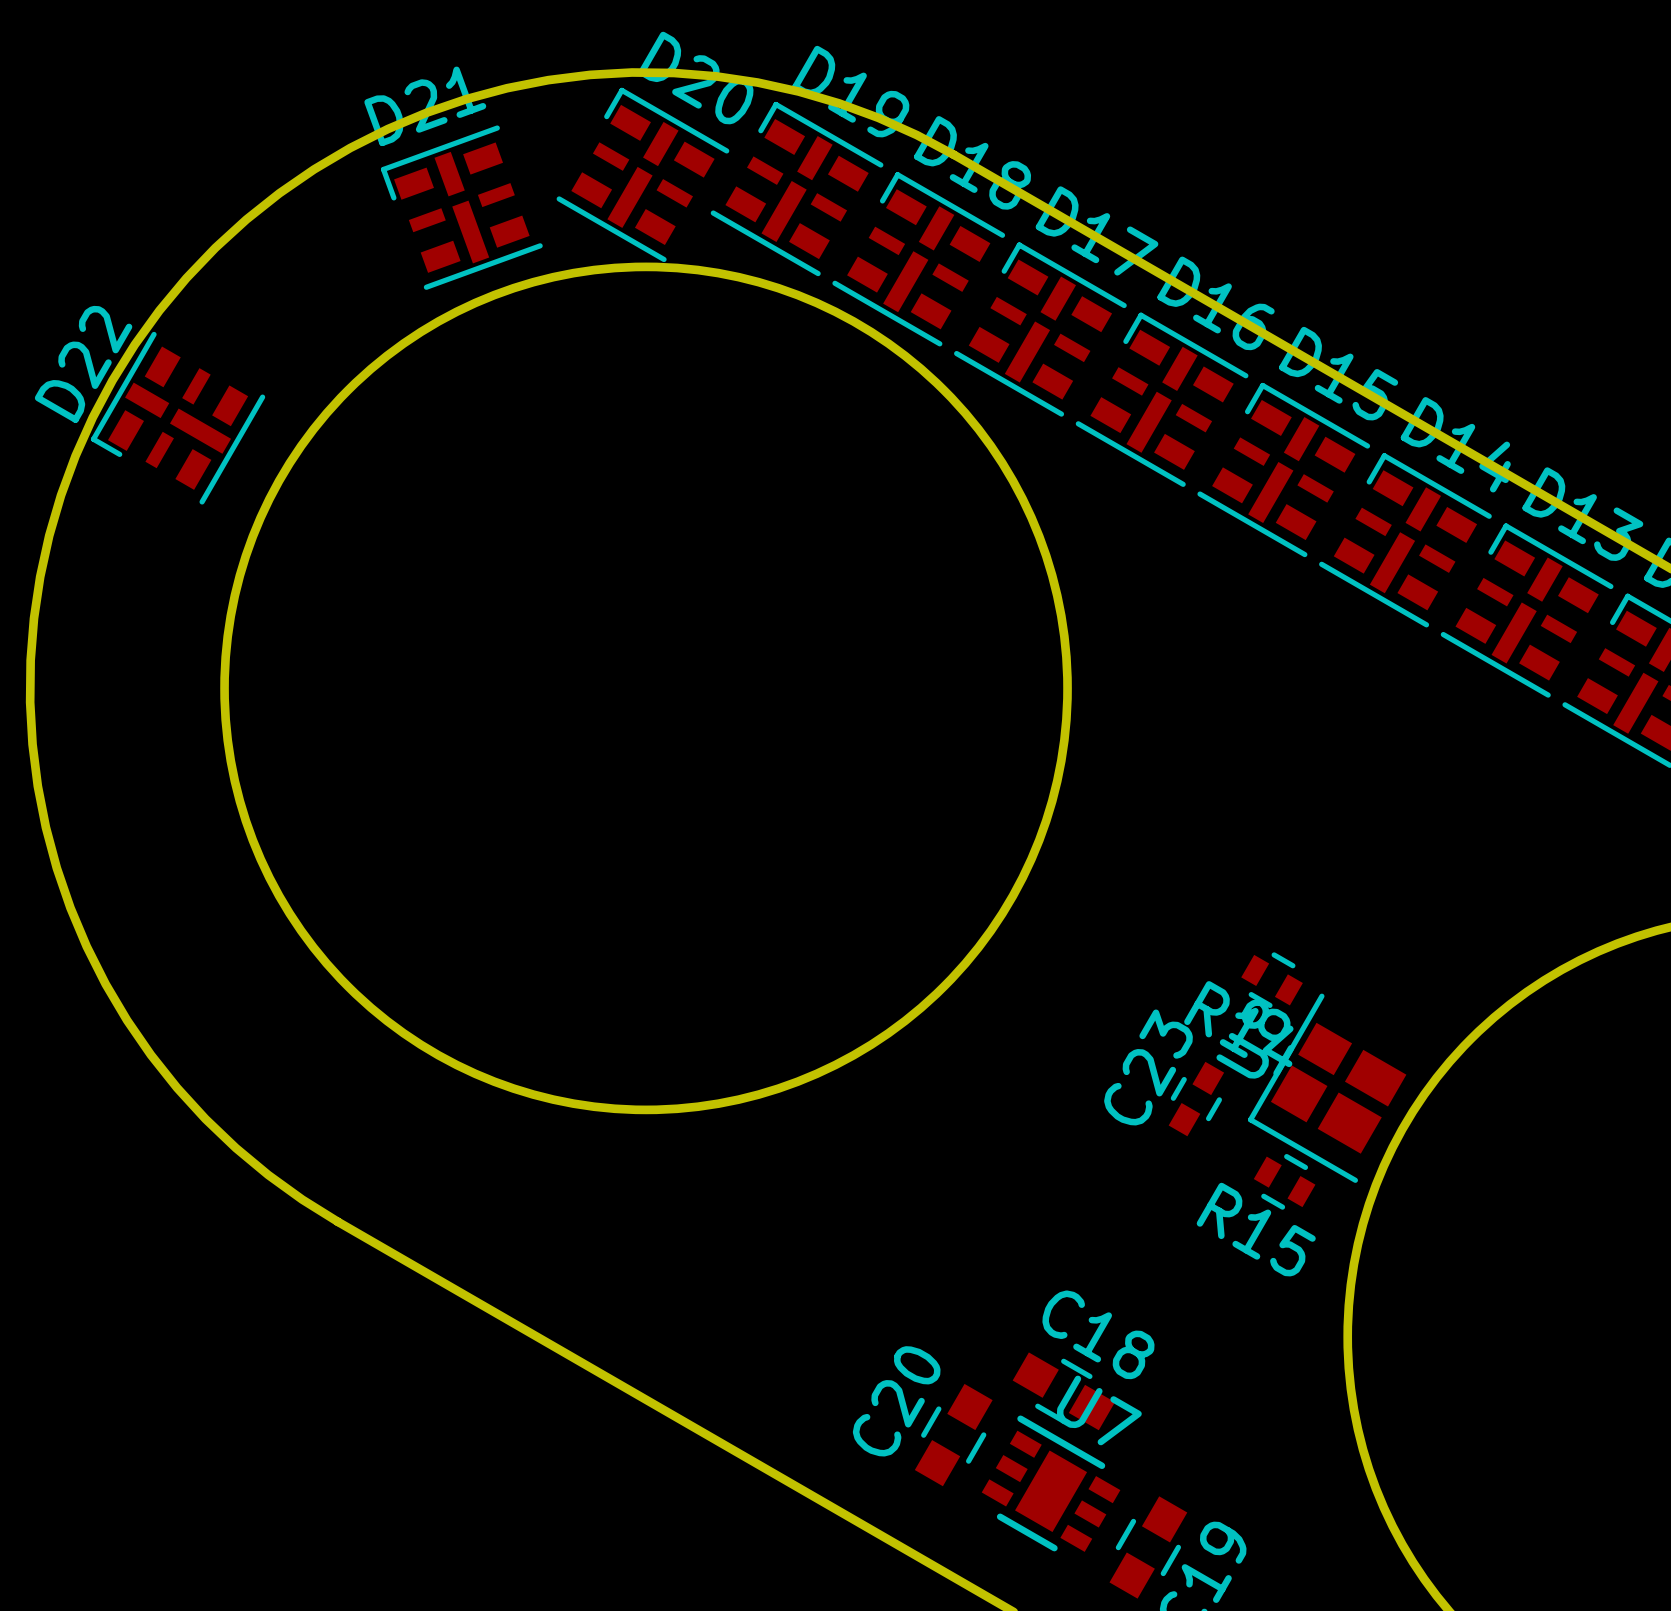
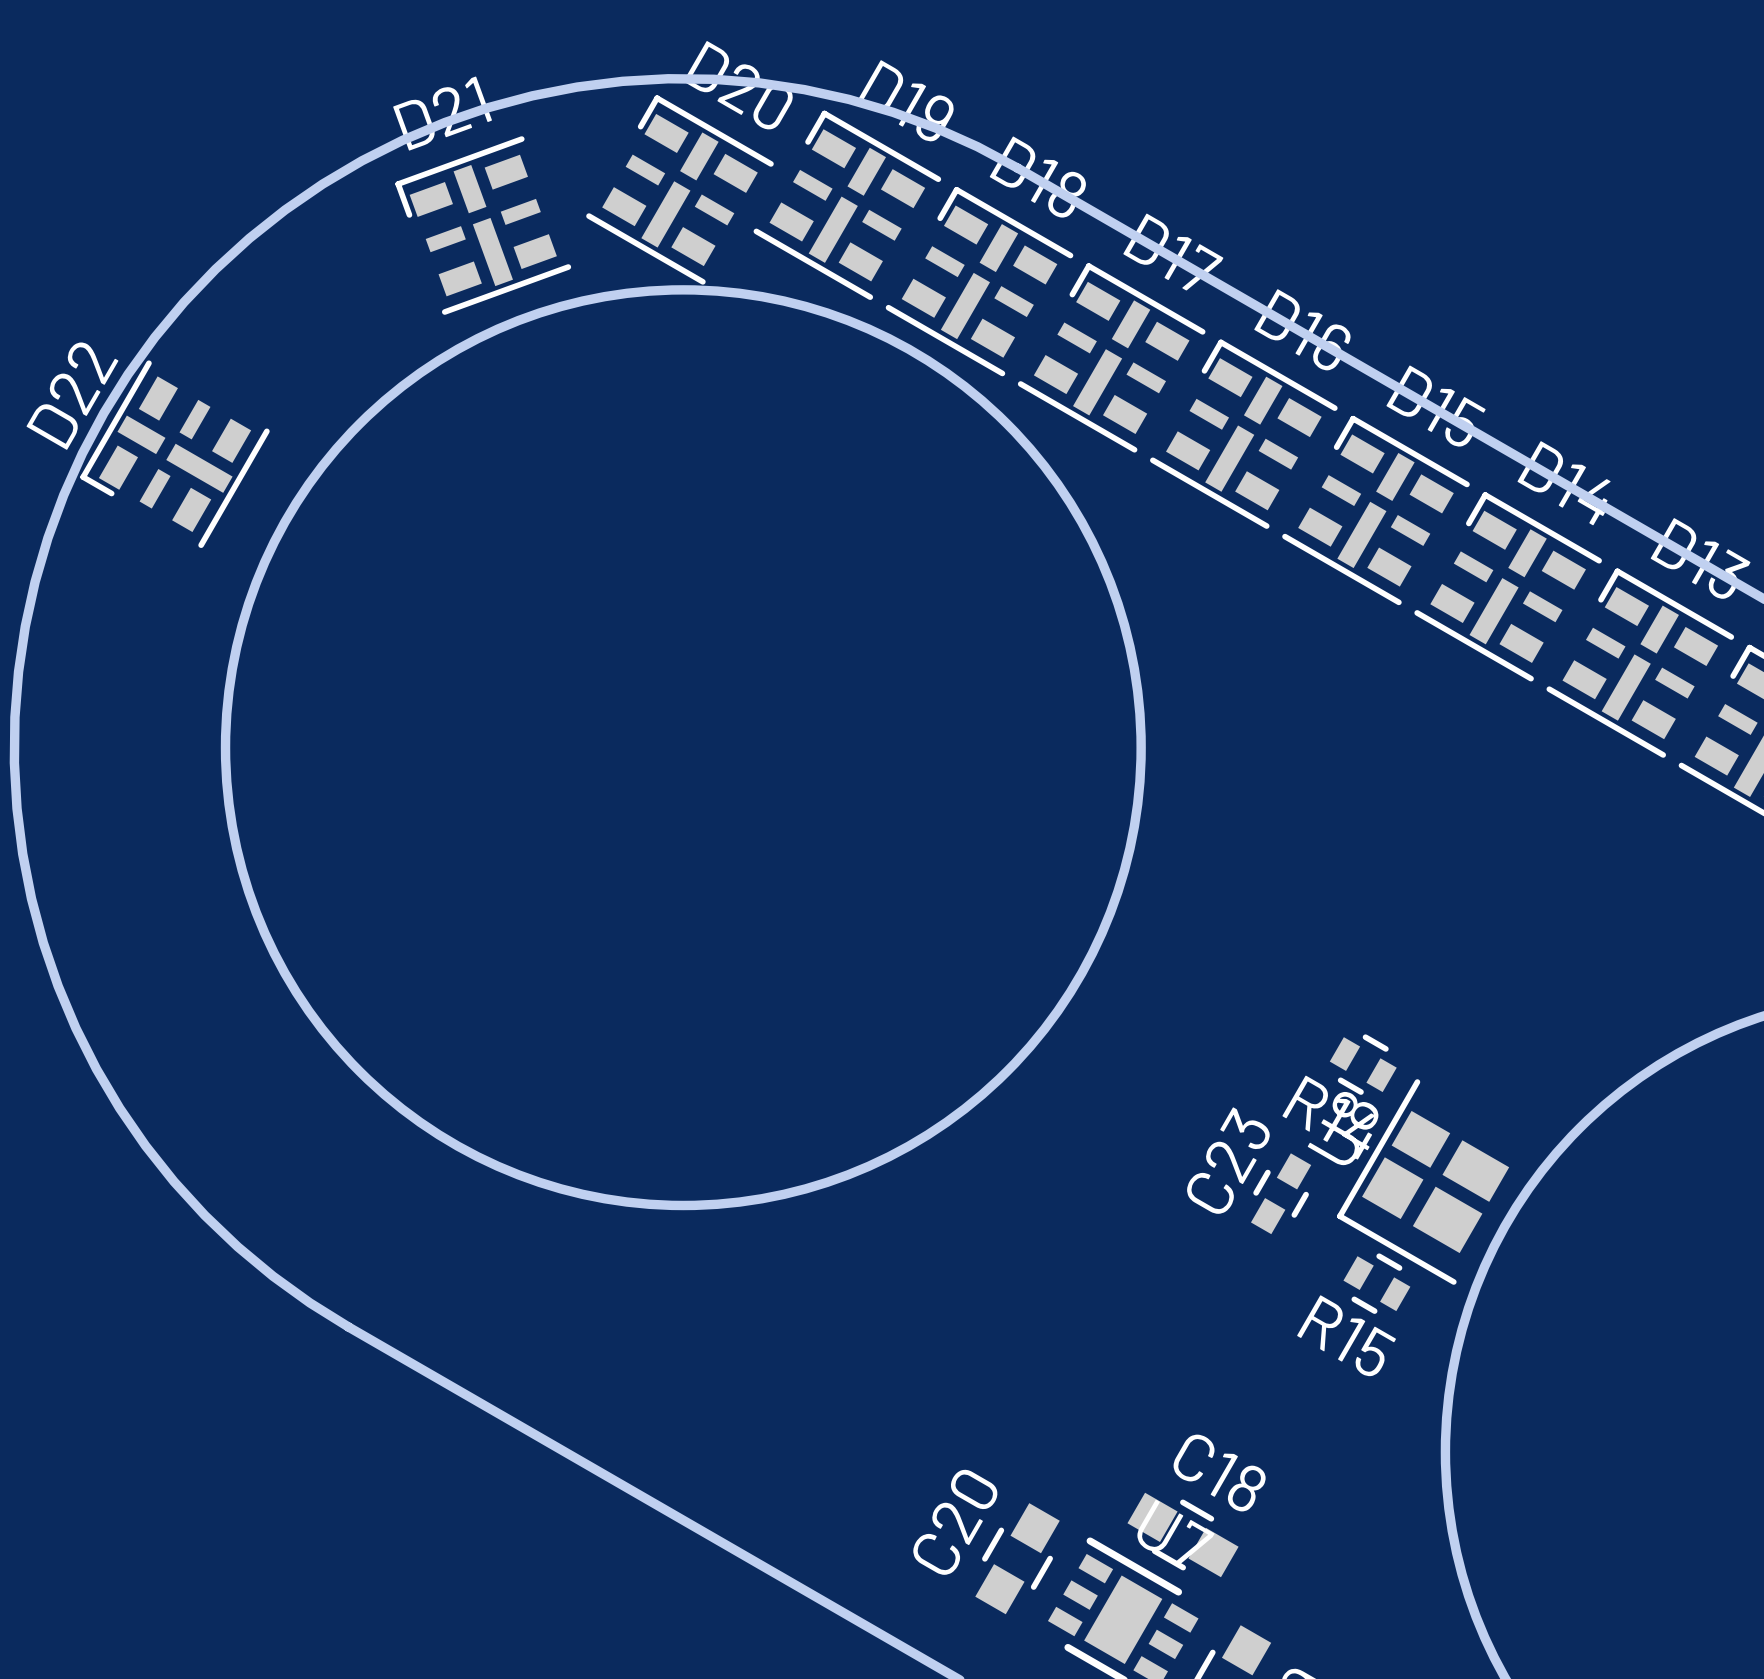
C18 position: (1063, 1391) -> (1183, 1534)

